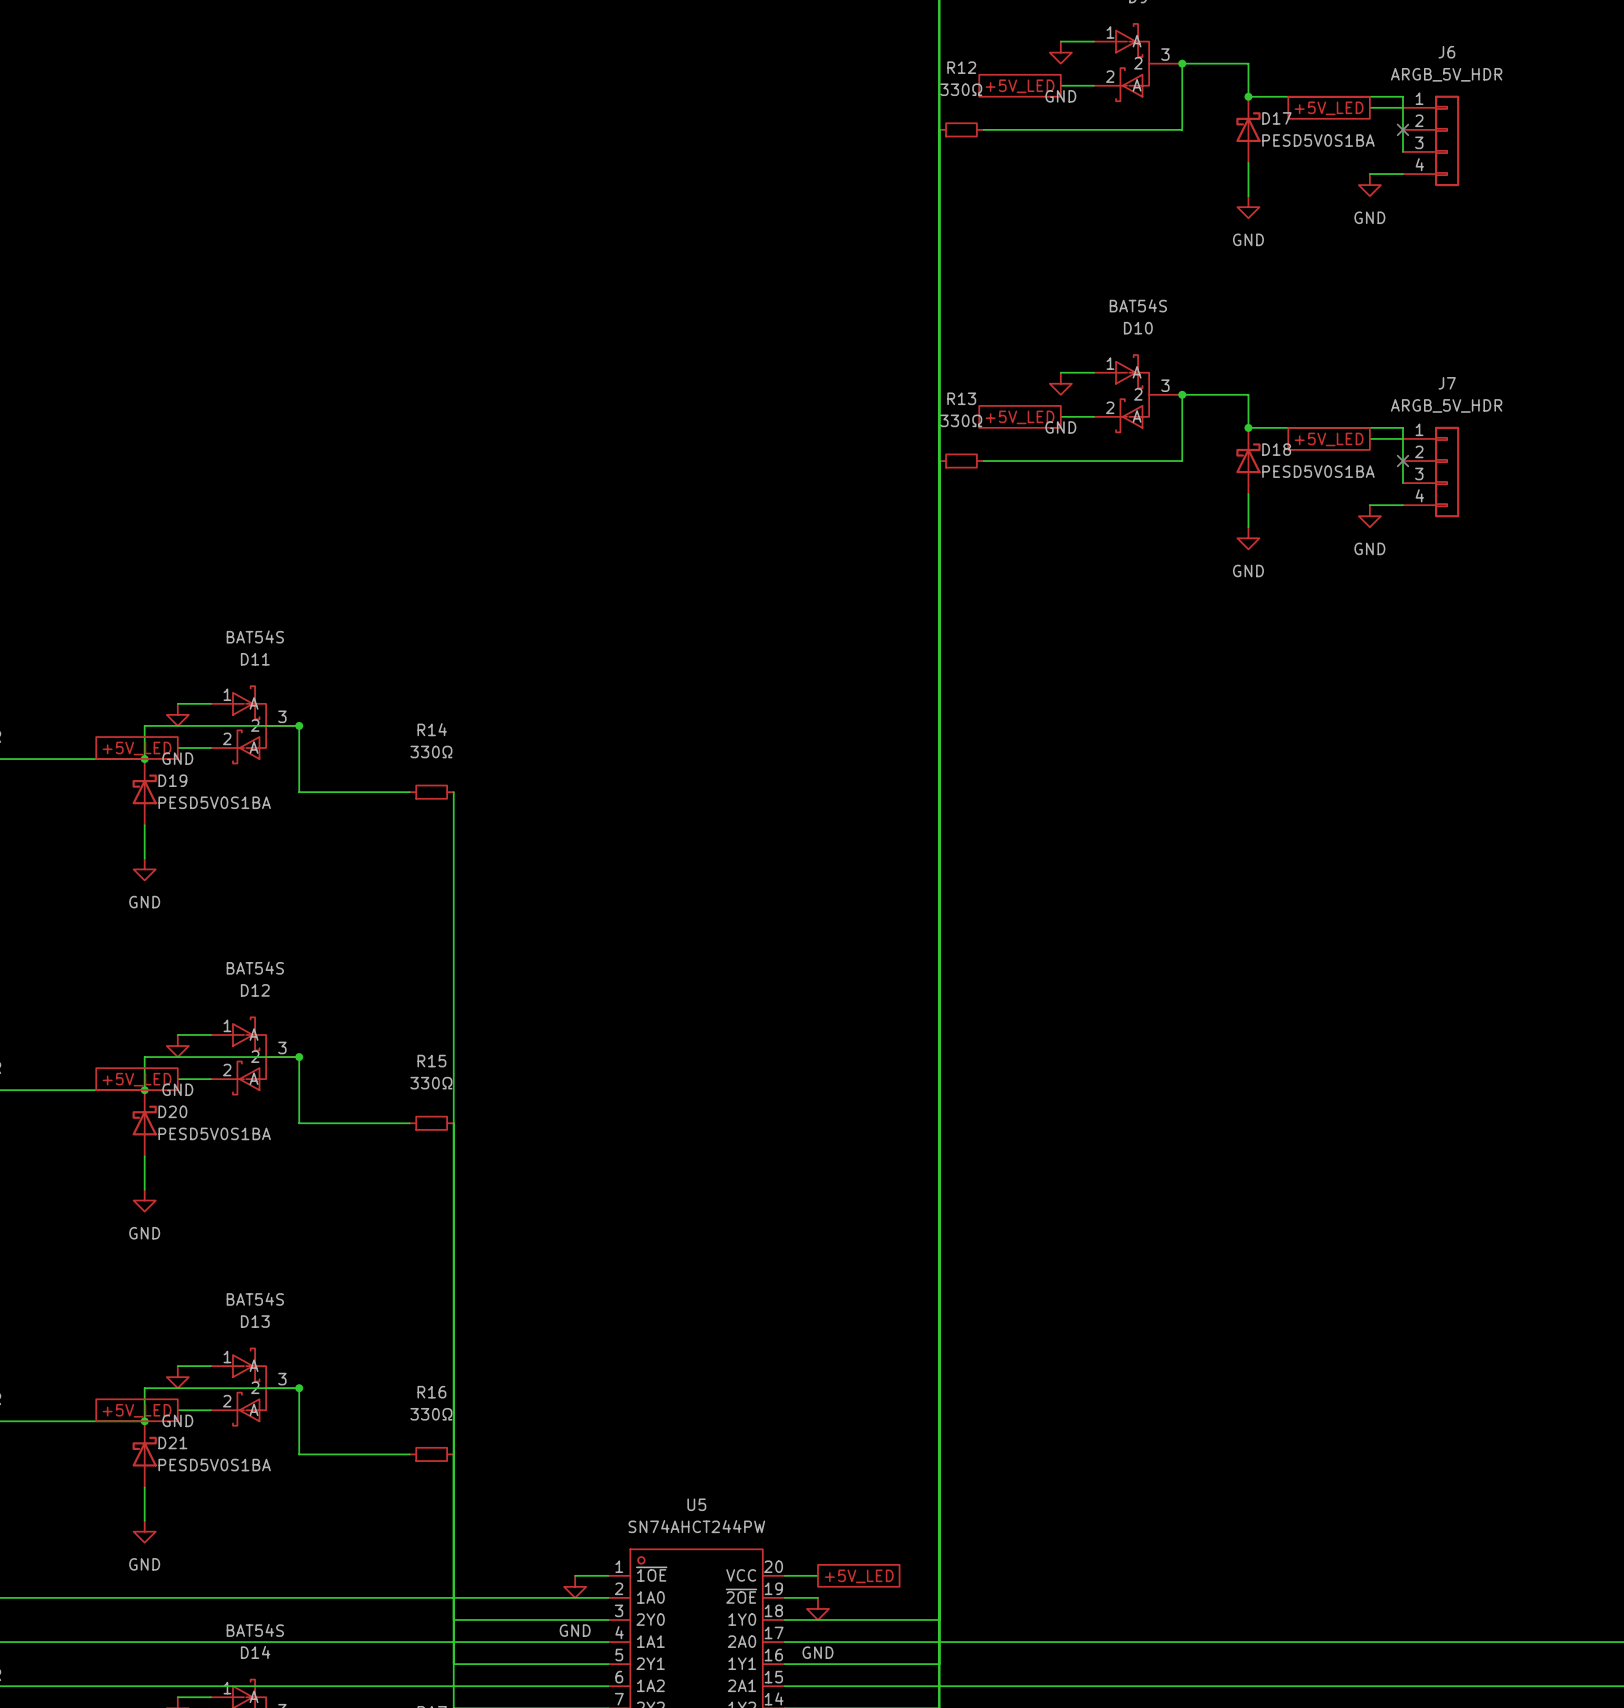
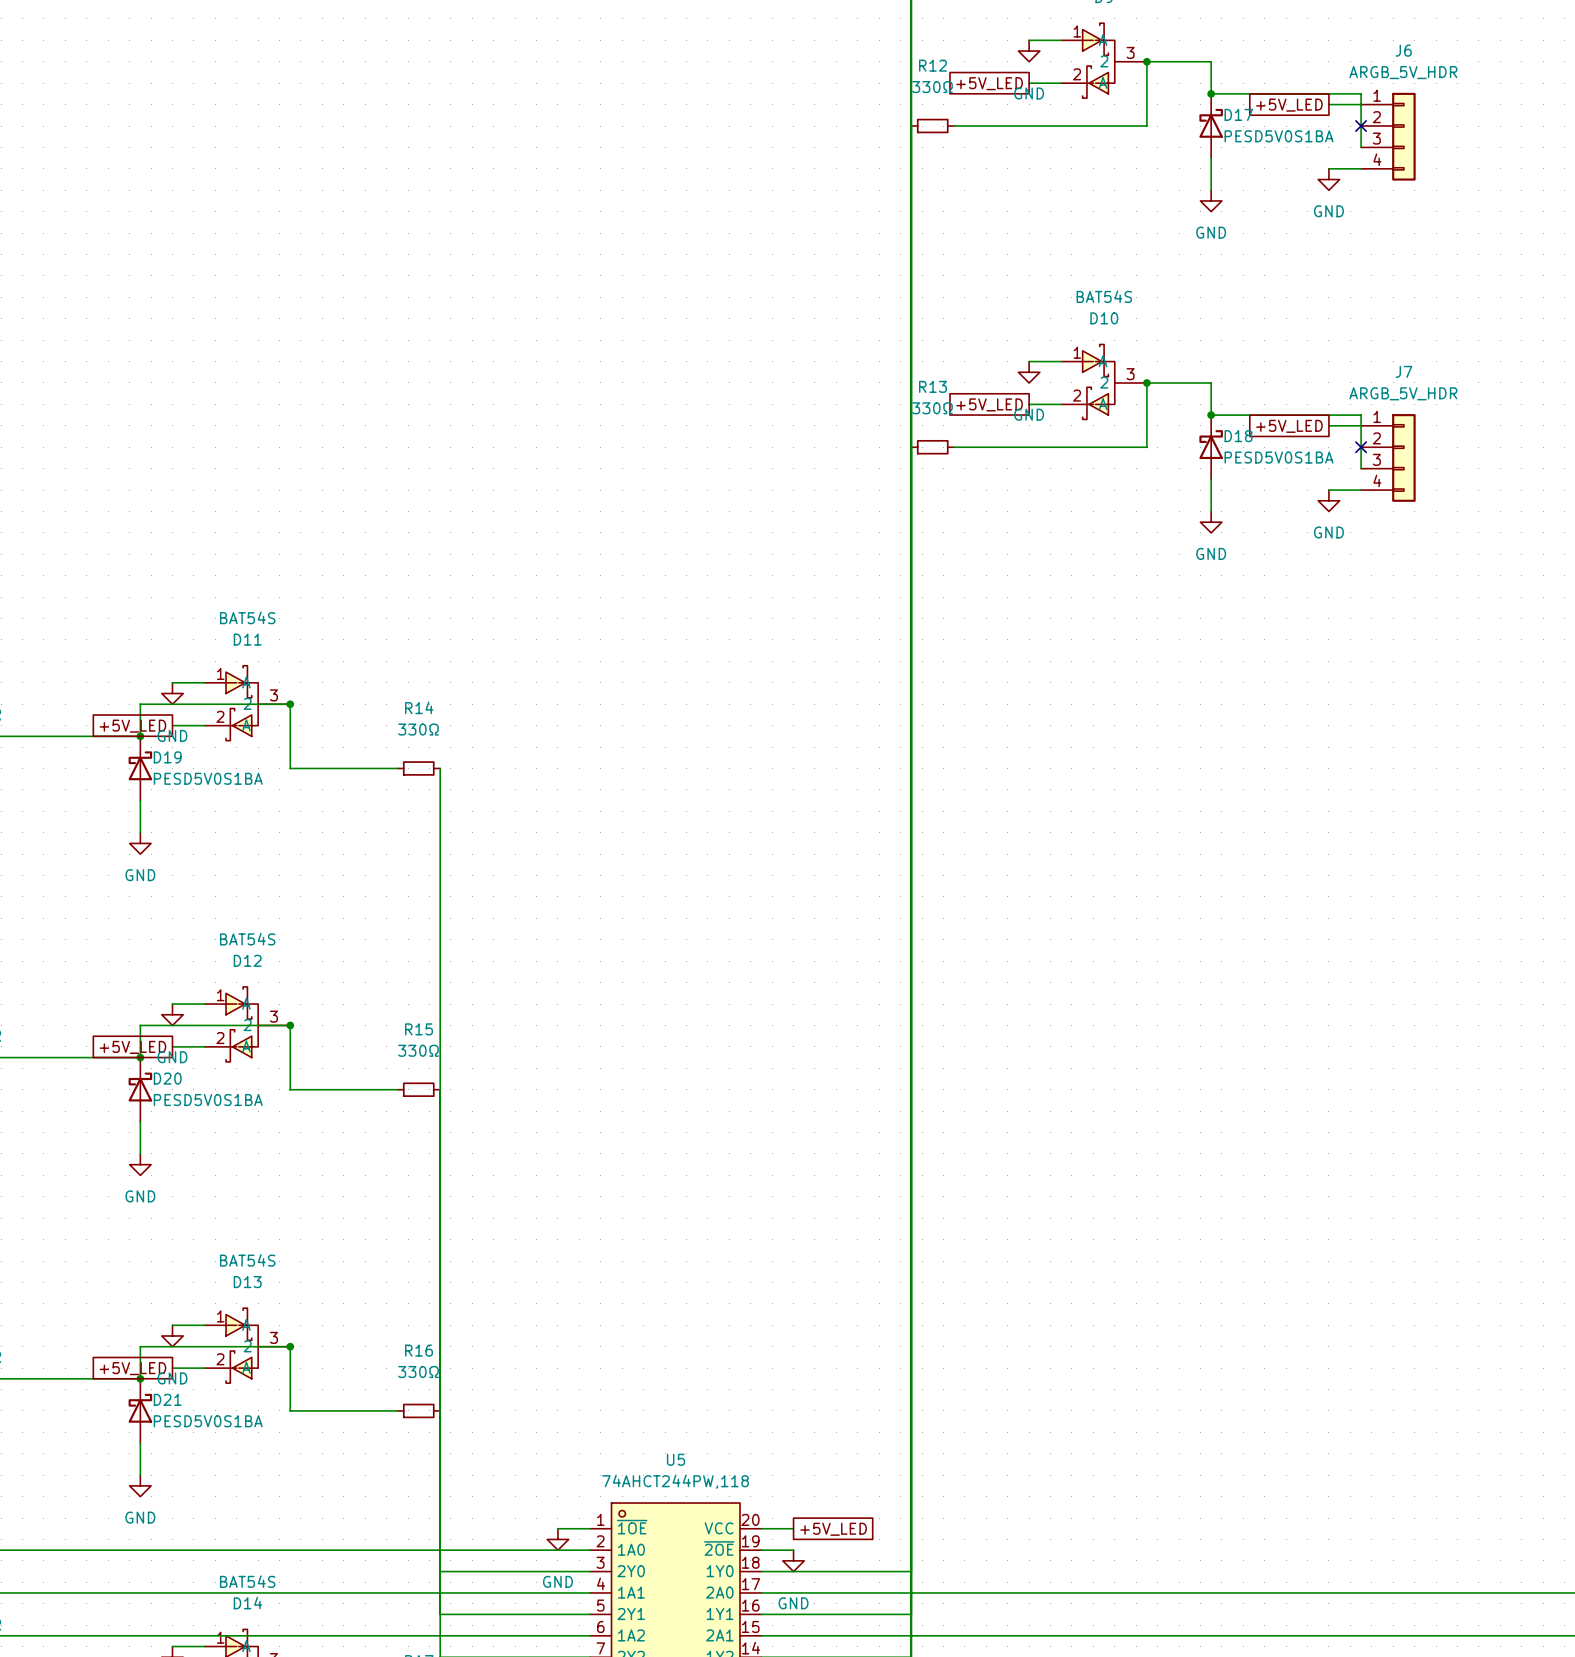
U5 value: SN74AHCT244PW (696, 1526) -> 74AHCT244PW,118 (675, 1481)

